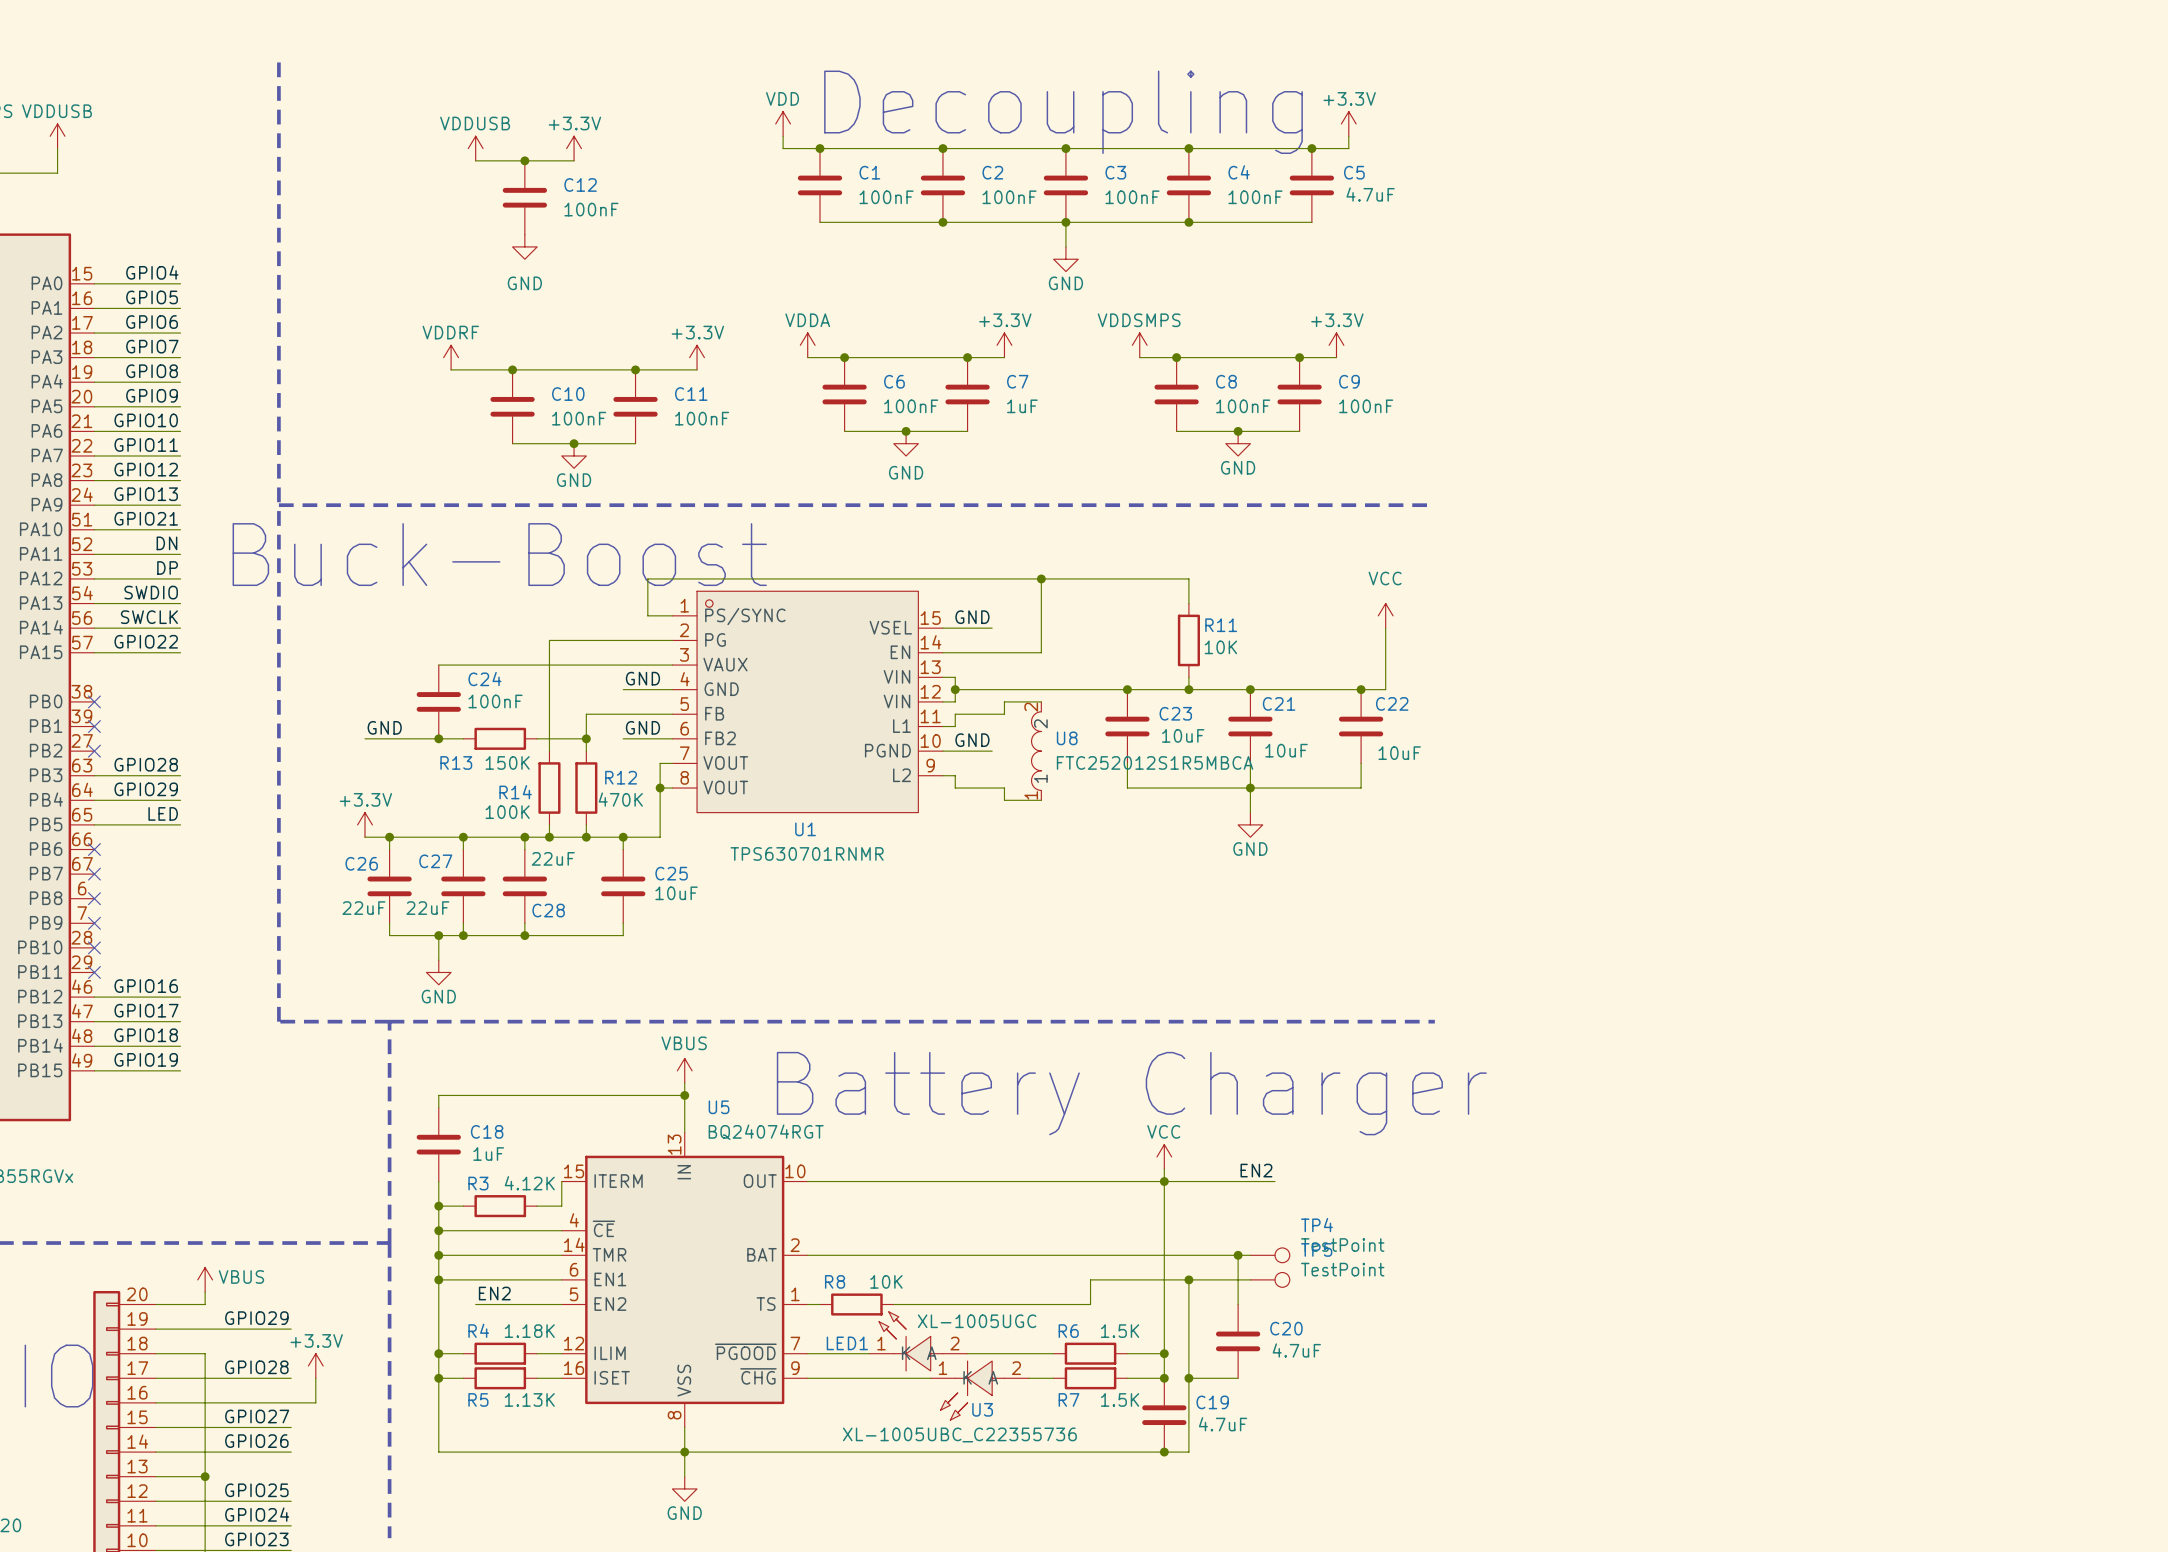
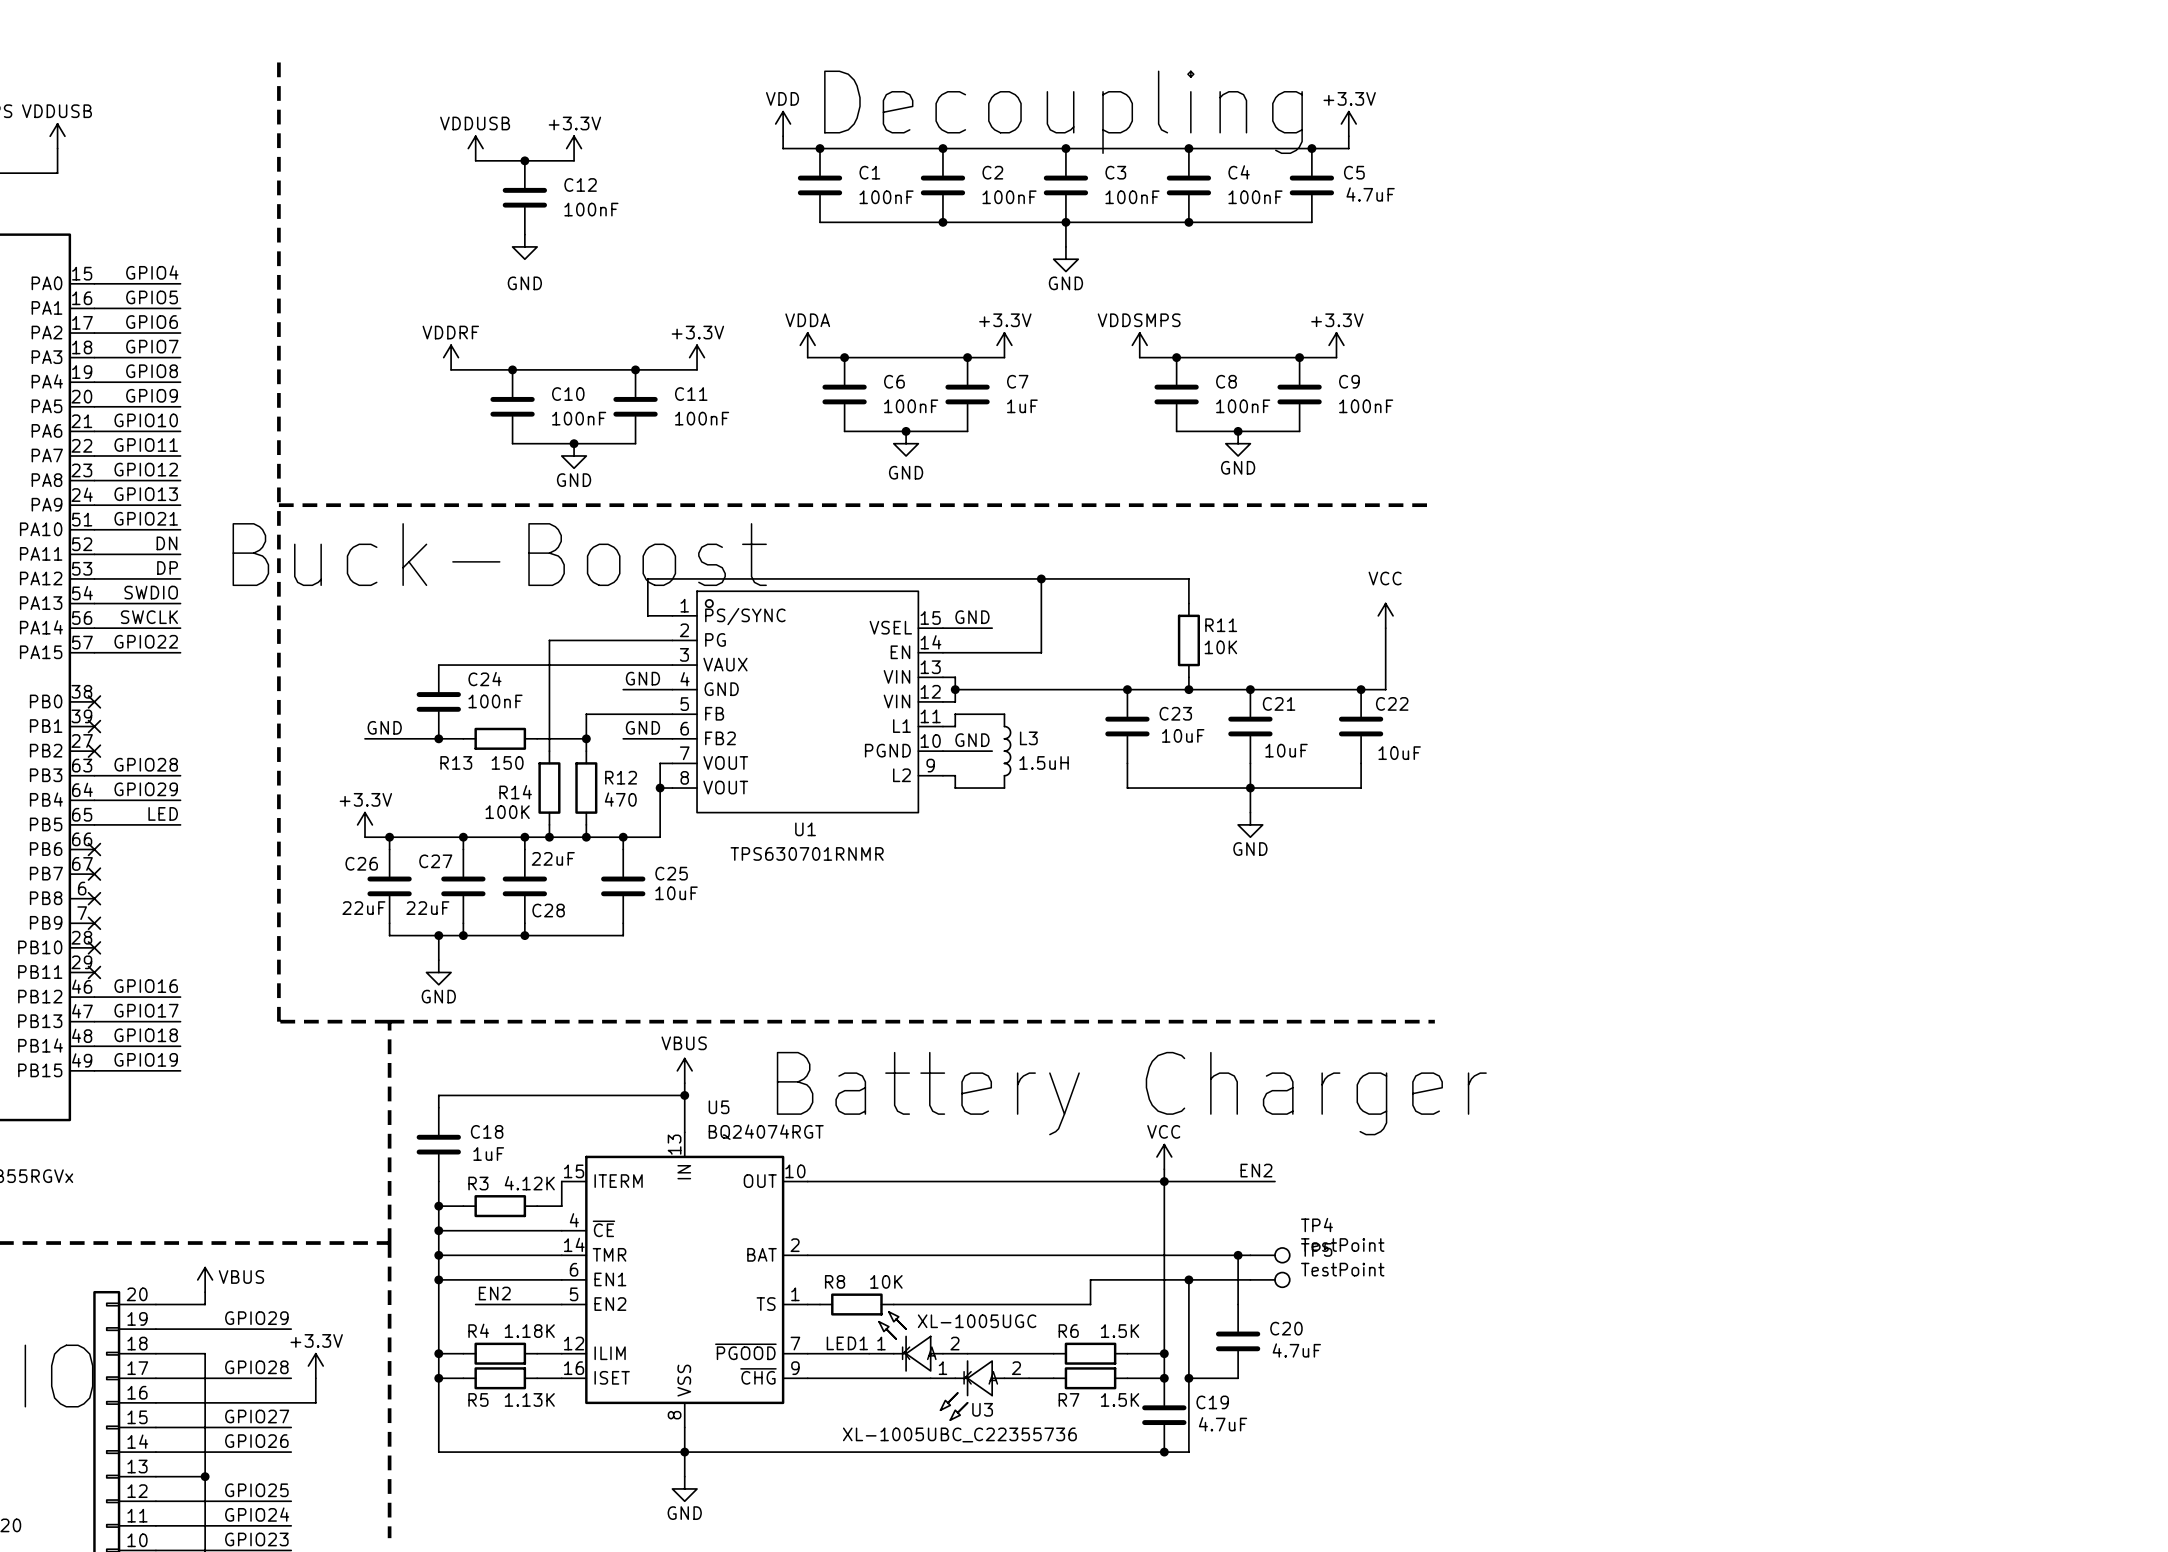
wire: (1041, 701) (1004, 701) (1004, 714) -> none
L3: none -> 1.5uH (1007, 751)
U8: FTC252012S1R5MBCA (1036, 751) -> none
R13 value: 150K (507, 762) -> 150 (507, 762)
wire: (1004, 788) (1004, 800) (1041, 800) -> none
R12 value: 470K (620, 799) -> 470 (620, 799)

